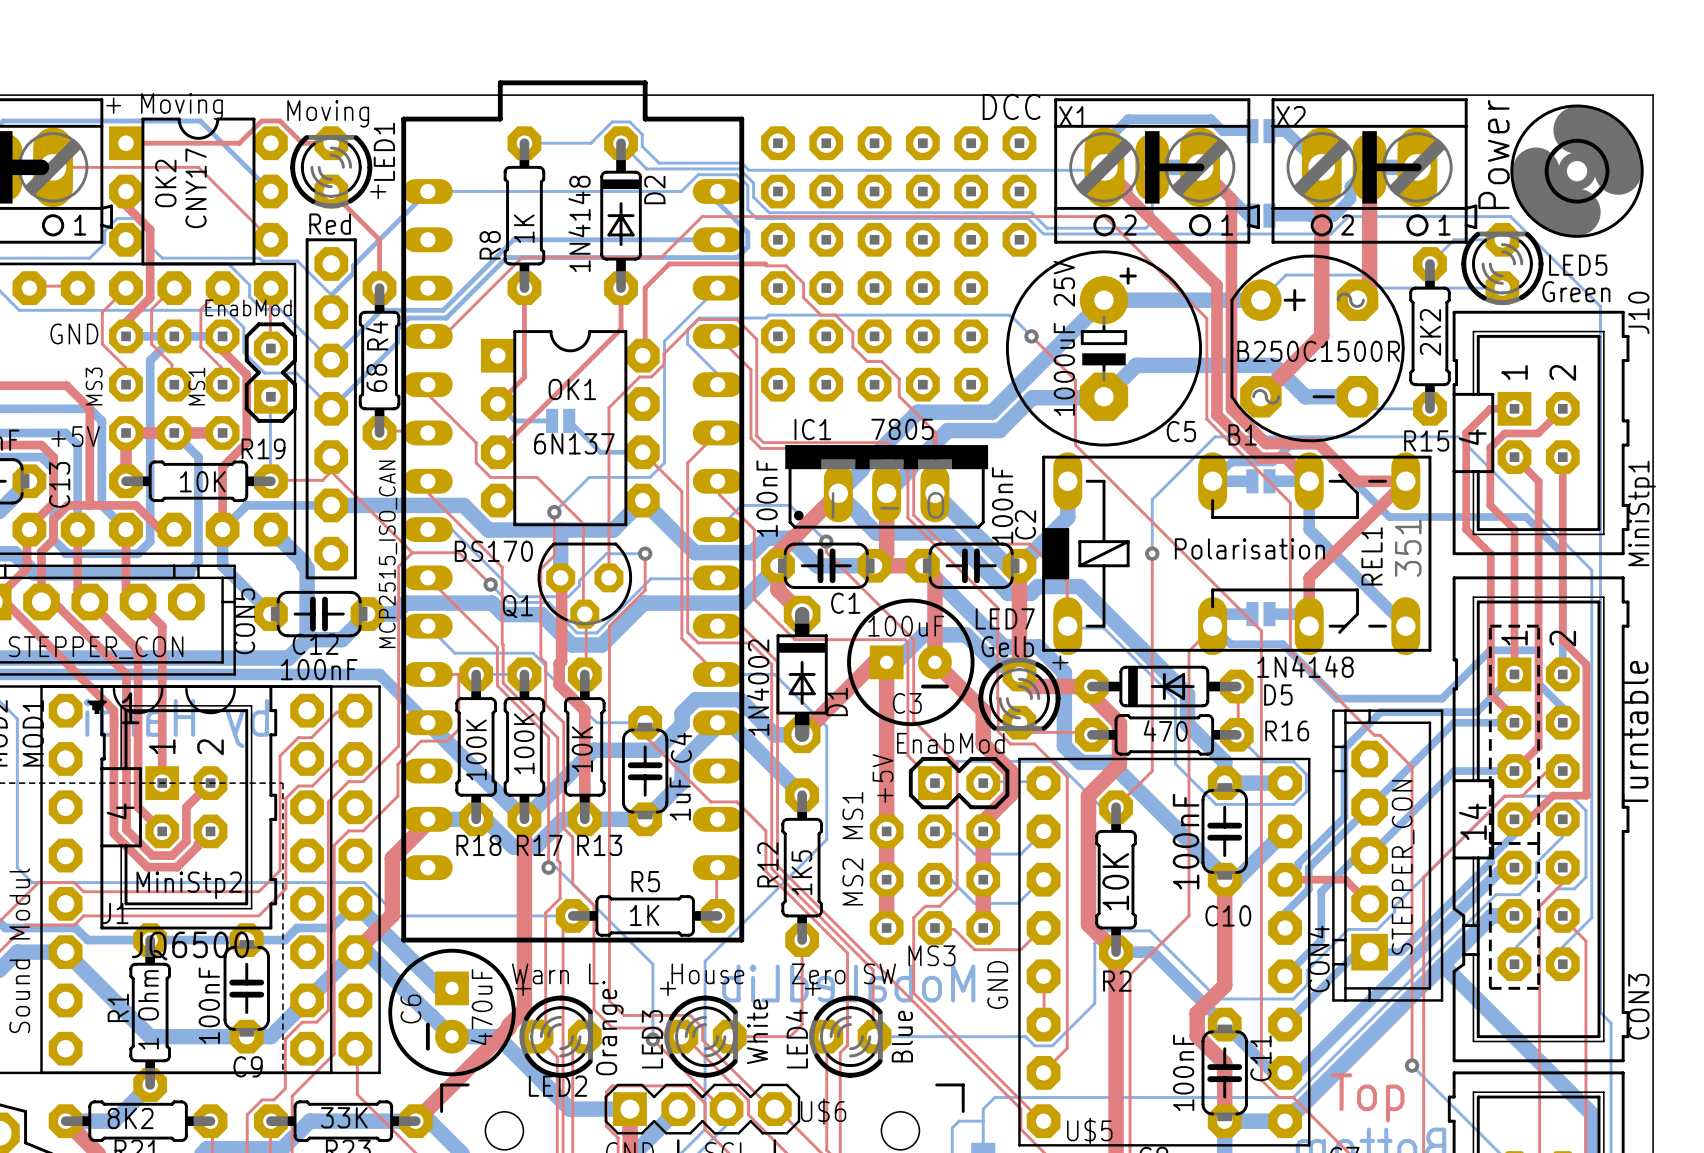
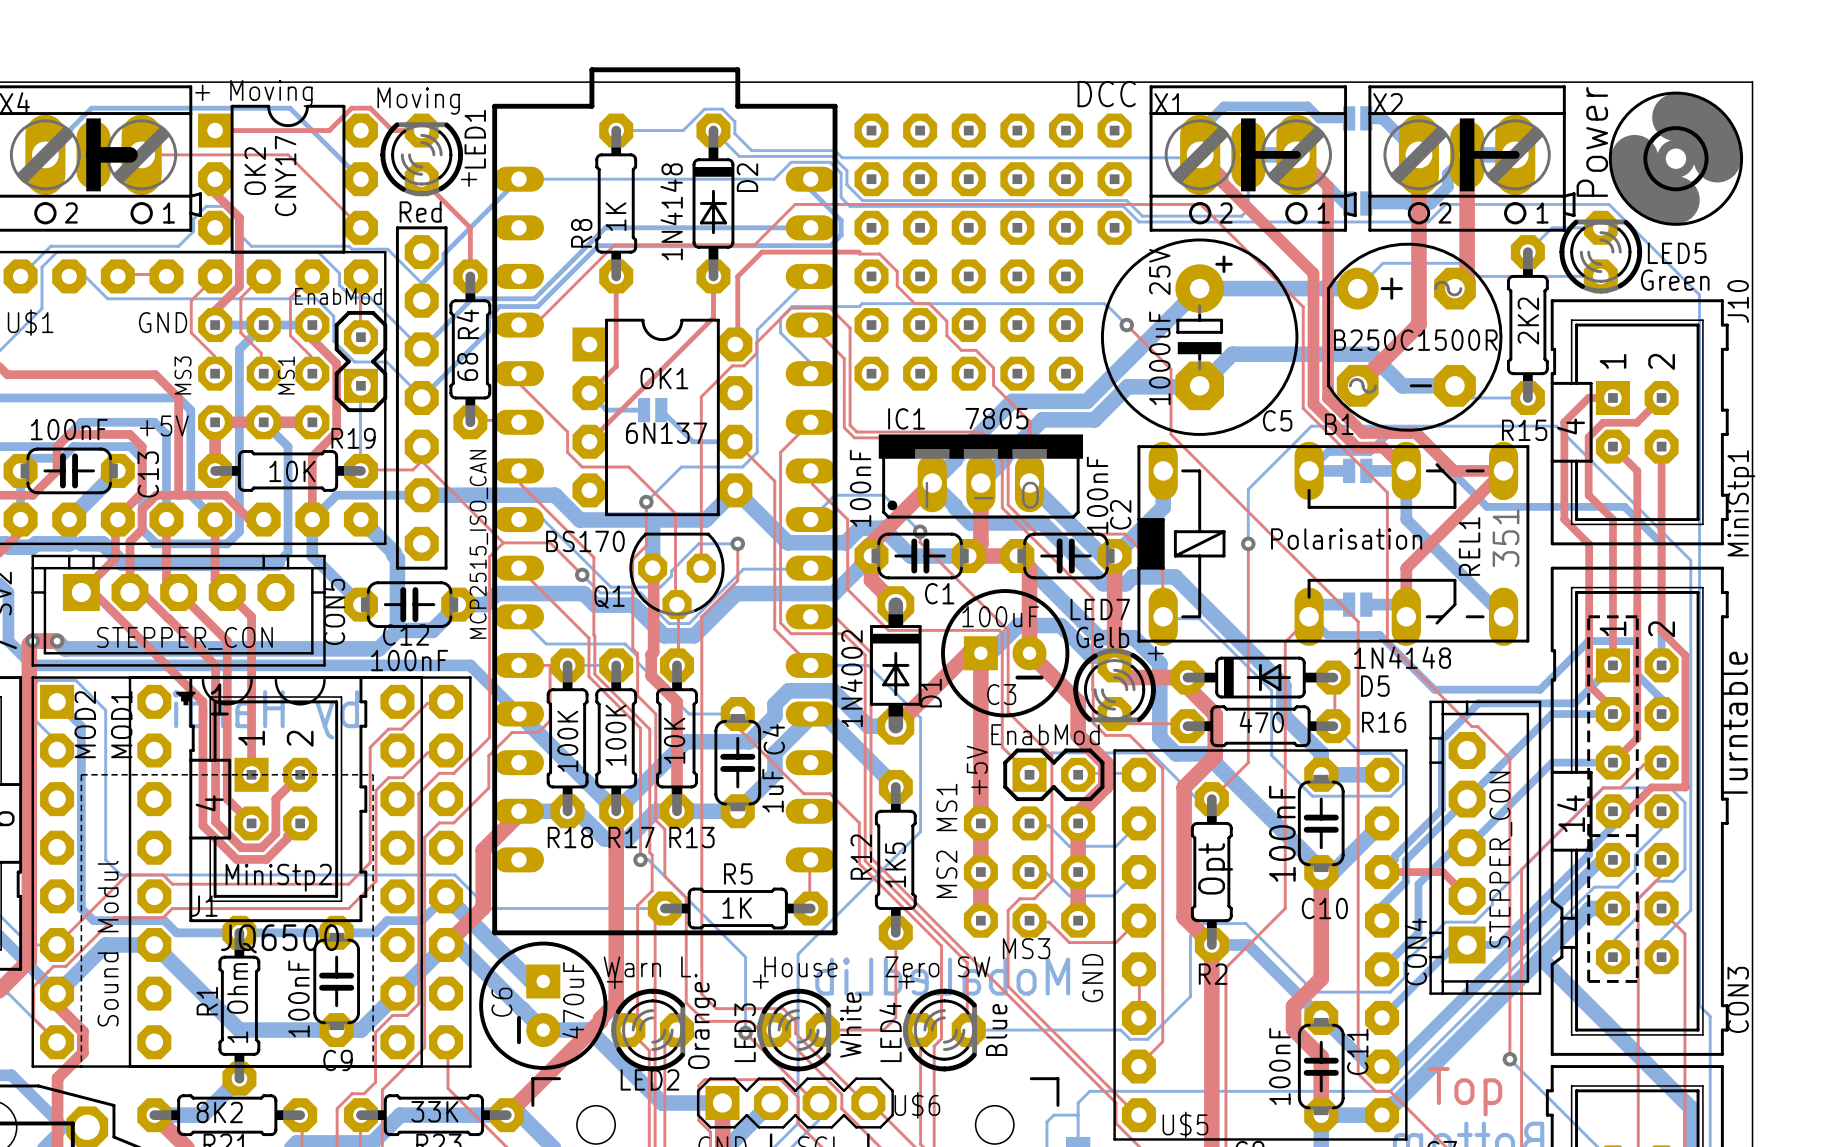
R2 value: 10K (1115, 881) -> Opt (1215, 868)

